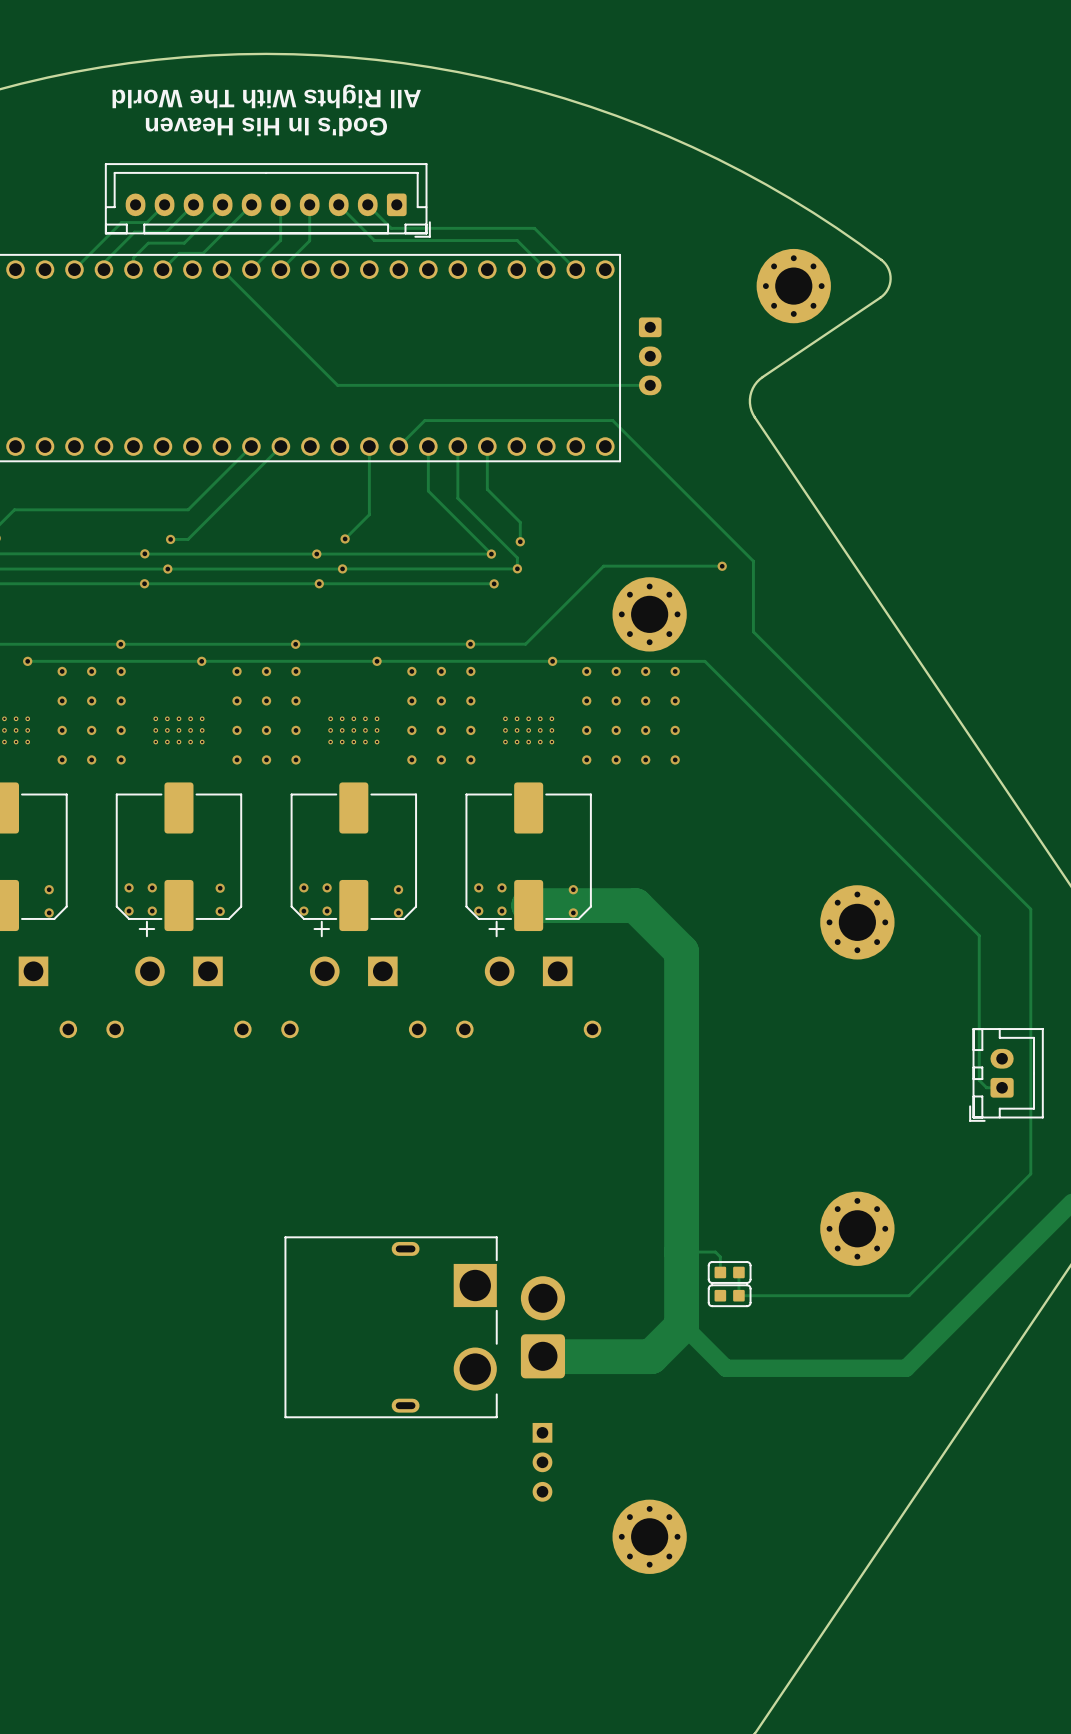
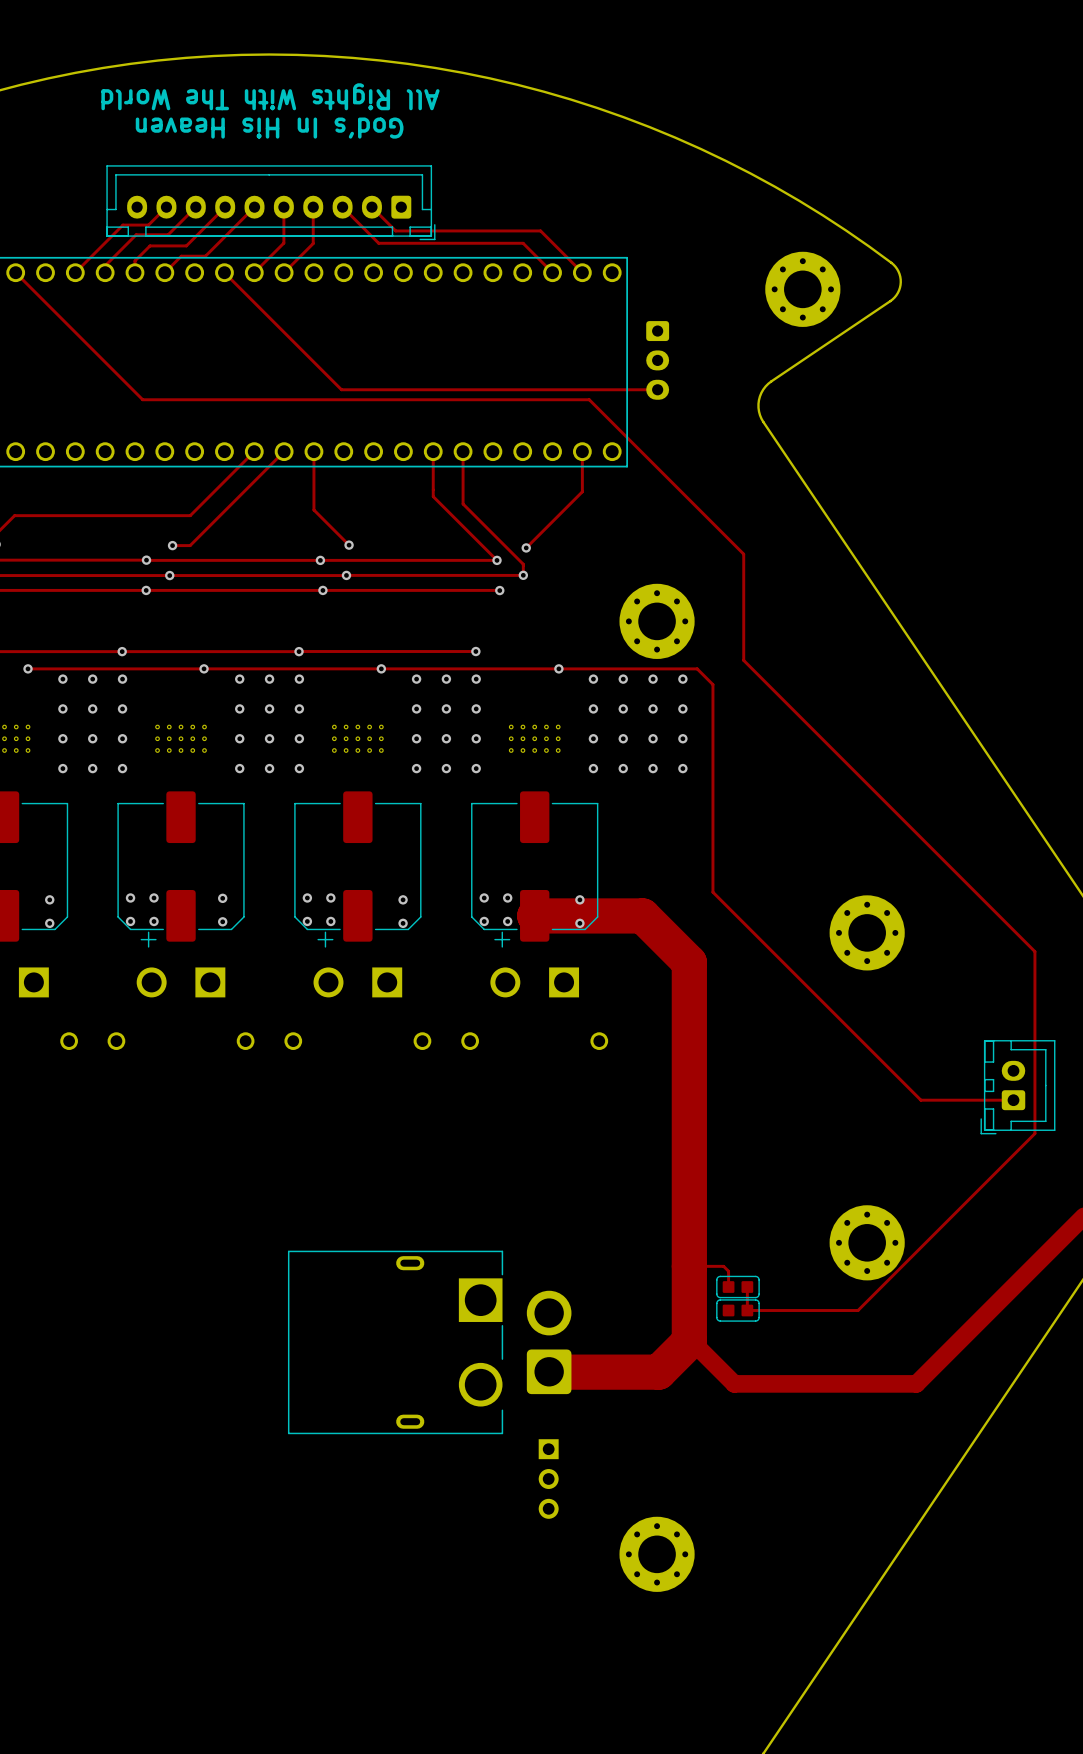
track: (369, 446) (369, 514) (345, 538) -> (313, 451) (313, 510) (349, 545)
track: (398, 446) (424, 420) (612, 420) (753, 561) (753, 631) (1030, 909) (1030, 1173) (909, 1295) (848, 1295) -> (15, 272) (142, 399) (589, 399) (743, 554) (743, 660) (1034, 951) (1034, 1133) (858, 1310)
track: (487, 446) (487, 489) (520, 522) (520, 541) -> (582, 451) (582, 491) (526, 547)
track: (722, 566) (603, 566) (525, 644) (470, 644) -> none
via: (722, 566) -> none
track: (689, 661) (704, 661) (979, 935) (979, 1080) (986, 1087) -> (697, 668) (712, 684) (712, 892) (920, 1100) (997, 1100)

